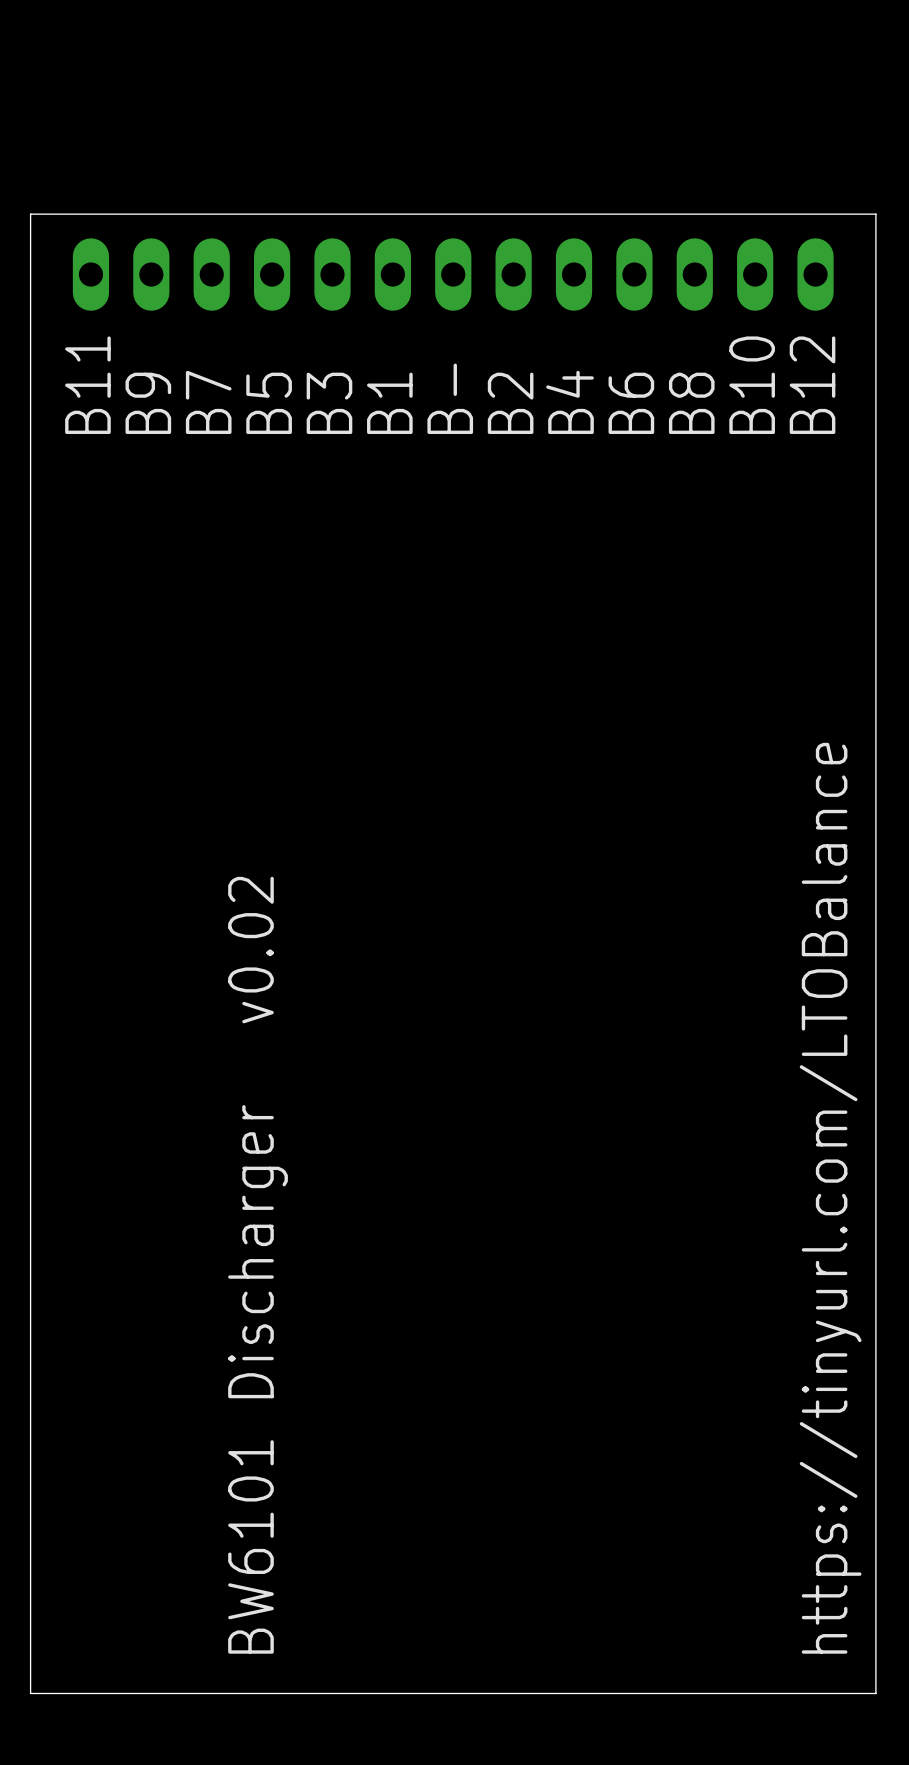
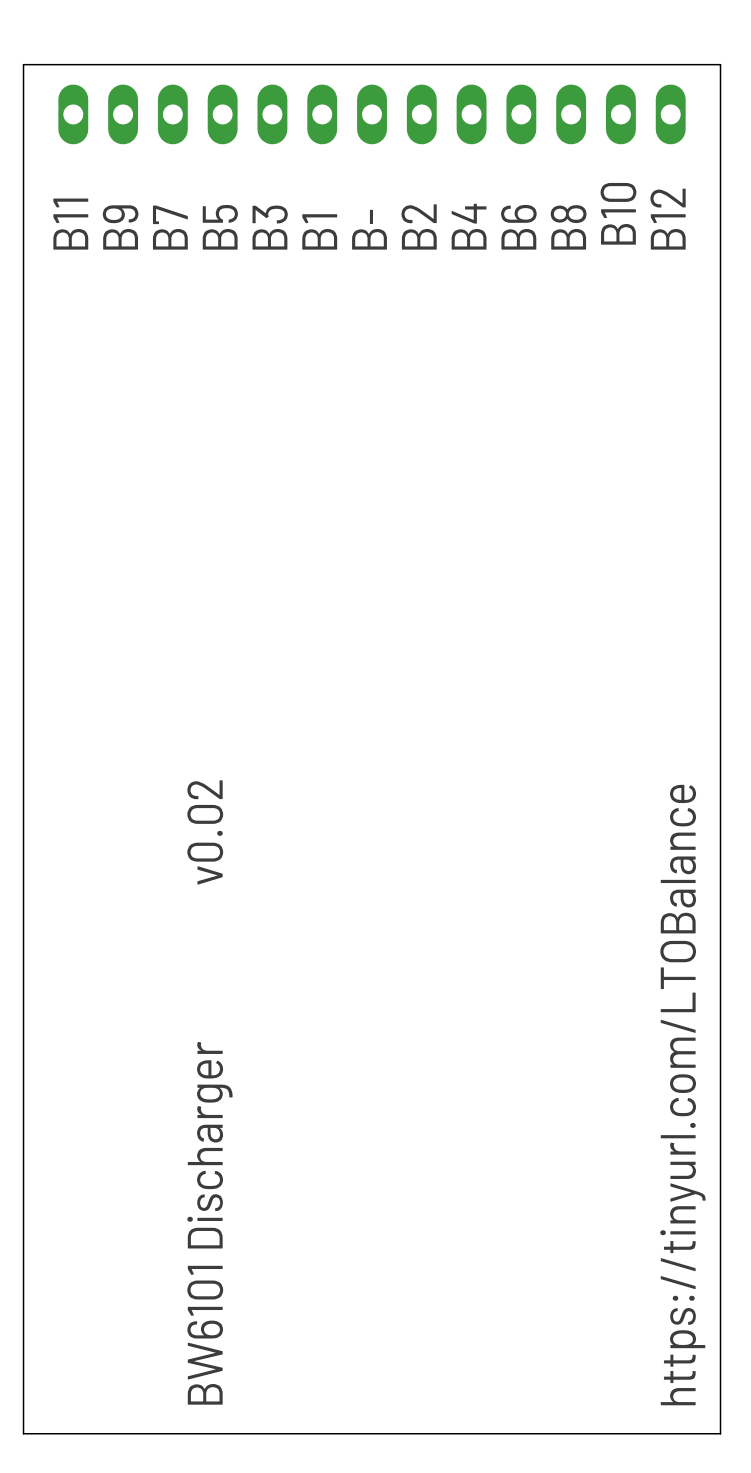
board edge: (875, 214) (30, 214) -> (720, 214) (720, 64) (23, 64) (23, 214)
part position: (453, 274) -> (372, 114)
text position: B11 (87, 385) -> B11 (70, 224)
text position: B10 (752, 385) -> B10 (618, 213)
text position: B12 (812, 385) -> B12 (668, 219)
text position: B- (450, 398) -> B- (369, 229)
text position: B7 (208, 402) -> B7 (170, 227)
text position: B4 (569, 402) -> B4 (469, 226)
text position: B9 (148, 403) -> B9 (120, 227)
text position: B5 (269, 403) -> B5 (220, 227)
text position: B3 (329, 403) -> B3 (270, 227)
text position: B1 (389, 403) -> B1 (319, 231)
text position: B2 (510, 403) -> B2 (419, 226)
text position: B6 (631, 403) -> B6 (518, 227)
text position: B8 (691, 403) -> B8 (568, 227)

